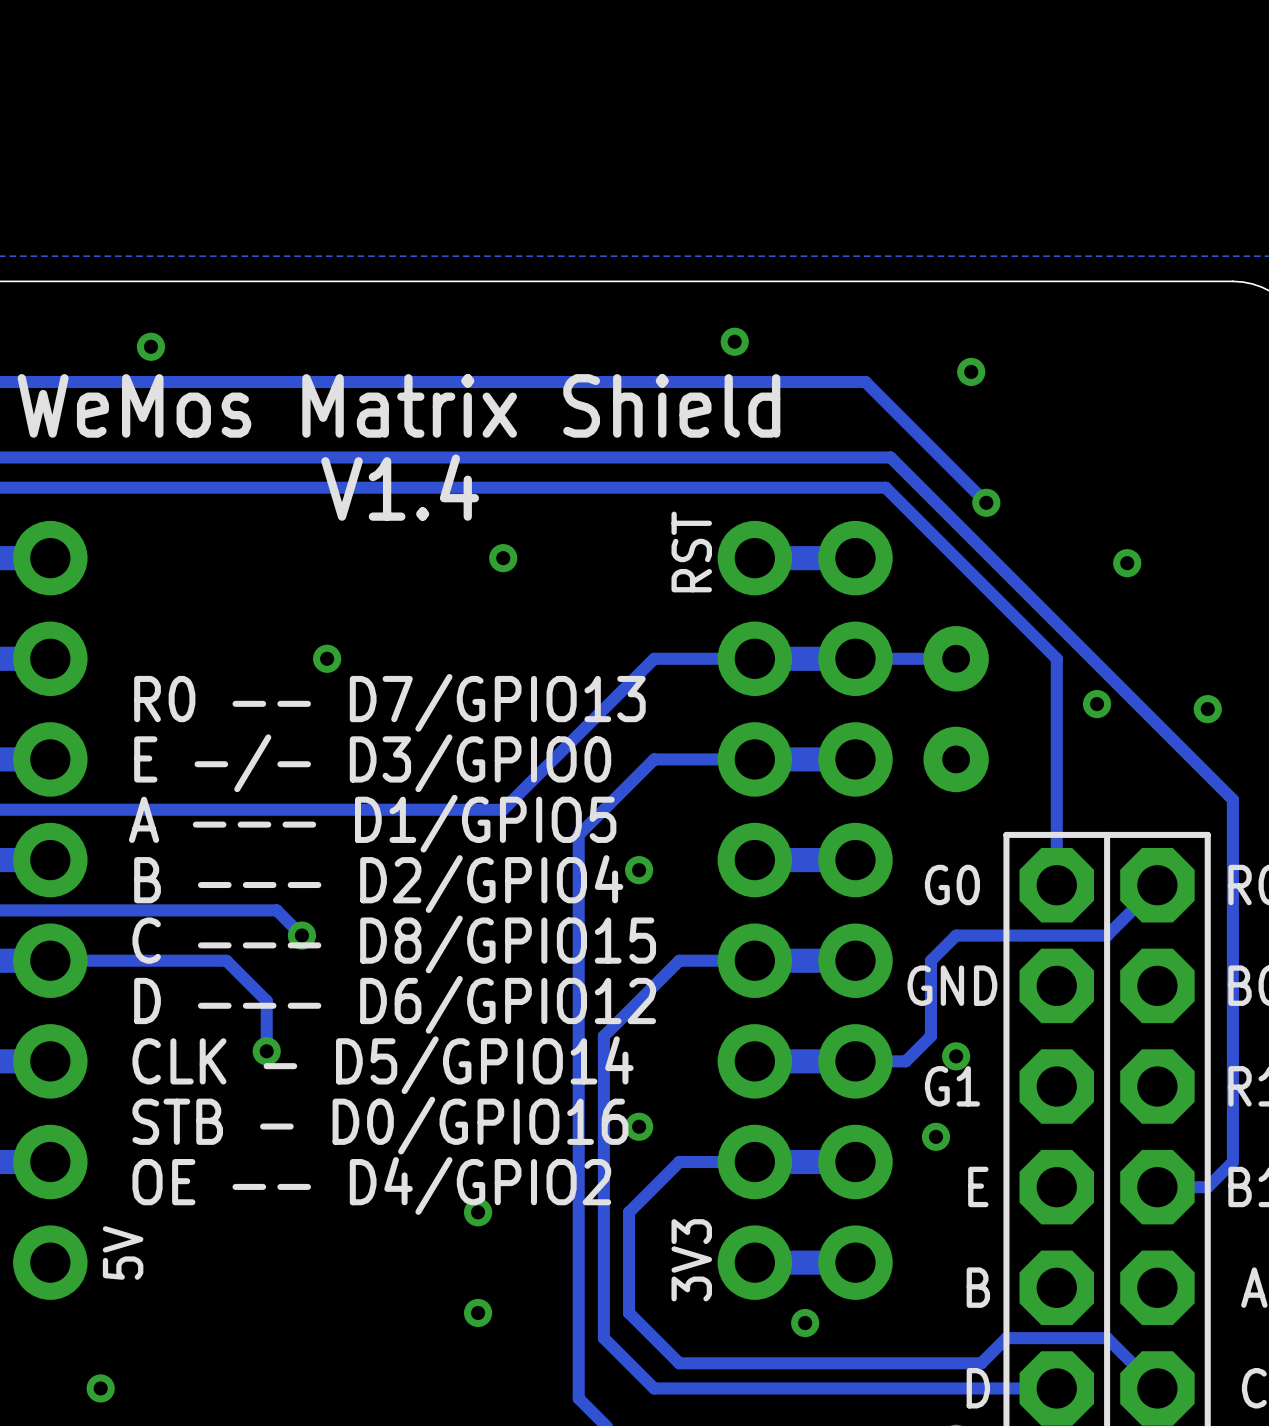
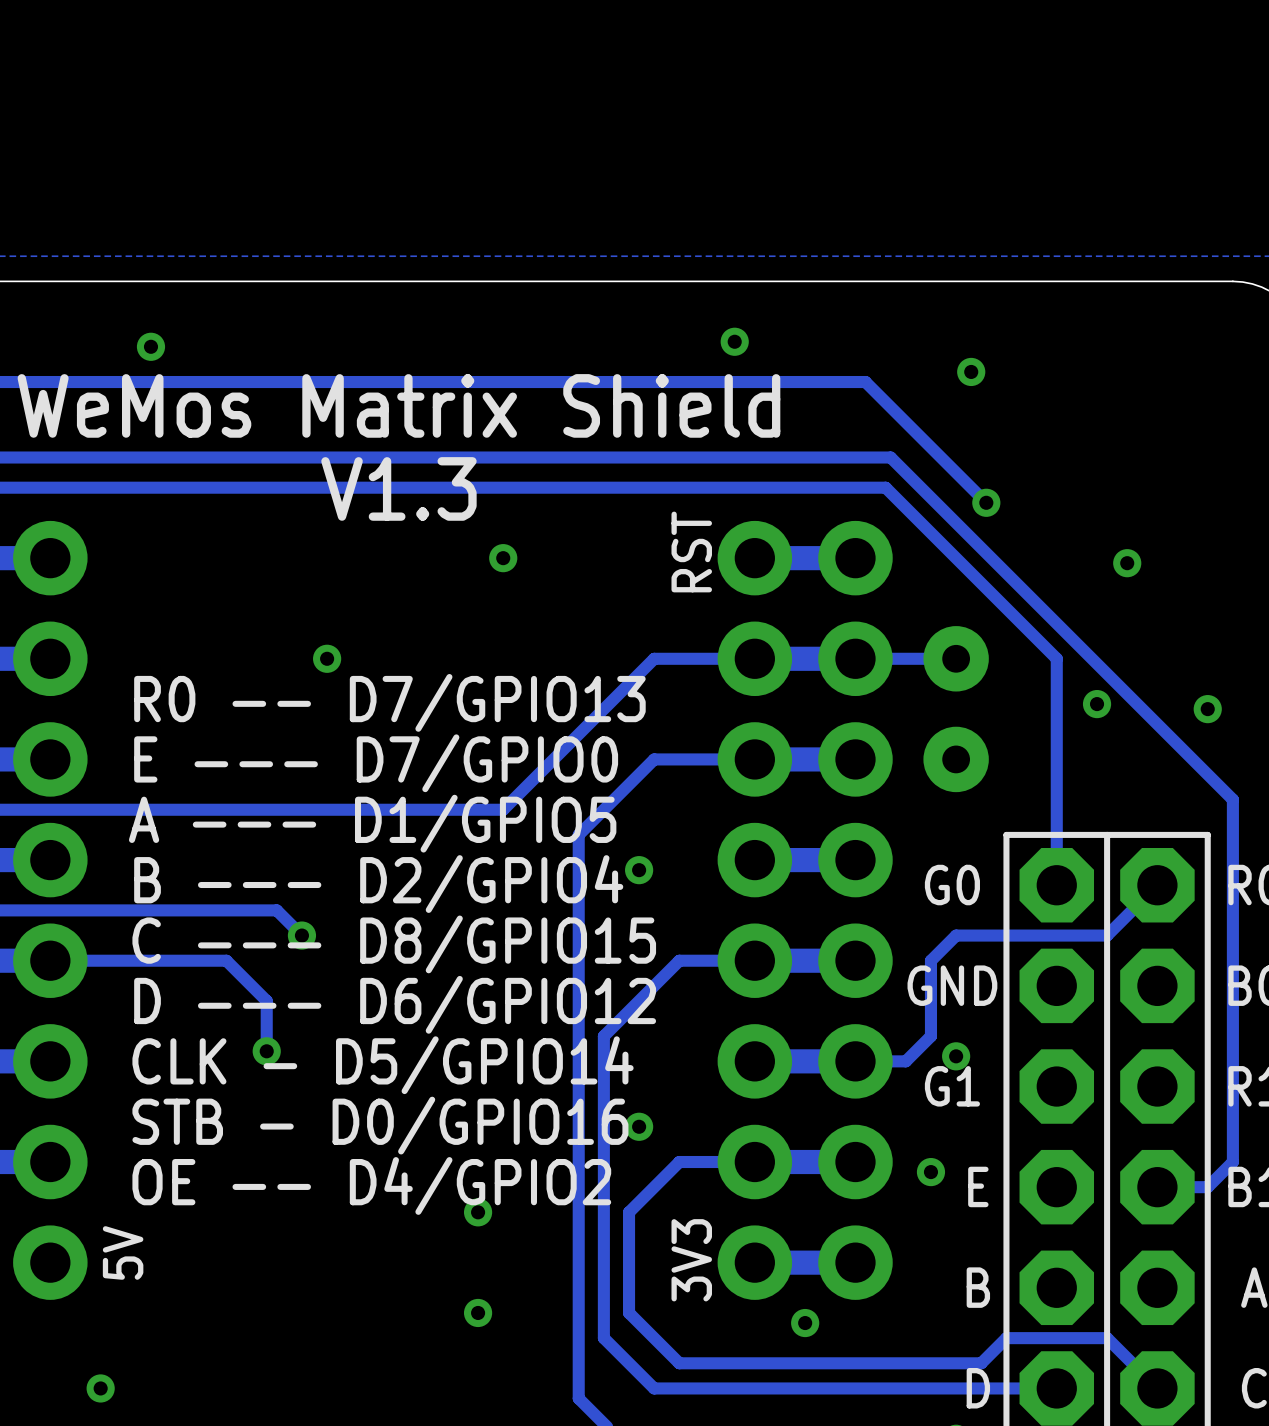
text: V1.4 (400, 487) -> V1.3 (398, 488)
text: E -/- D3/GPIO0 (372, 763) -> E --- D7/GPIO0 (376, 763)
via position: (936, 1136) -> (930, 1172)

